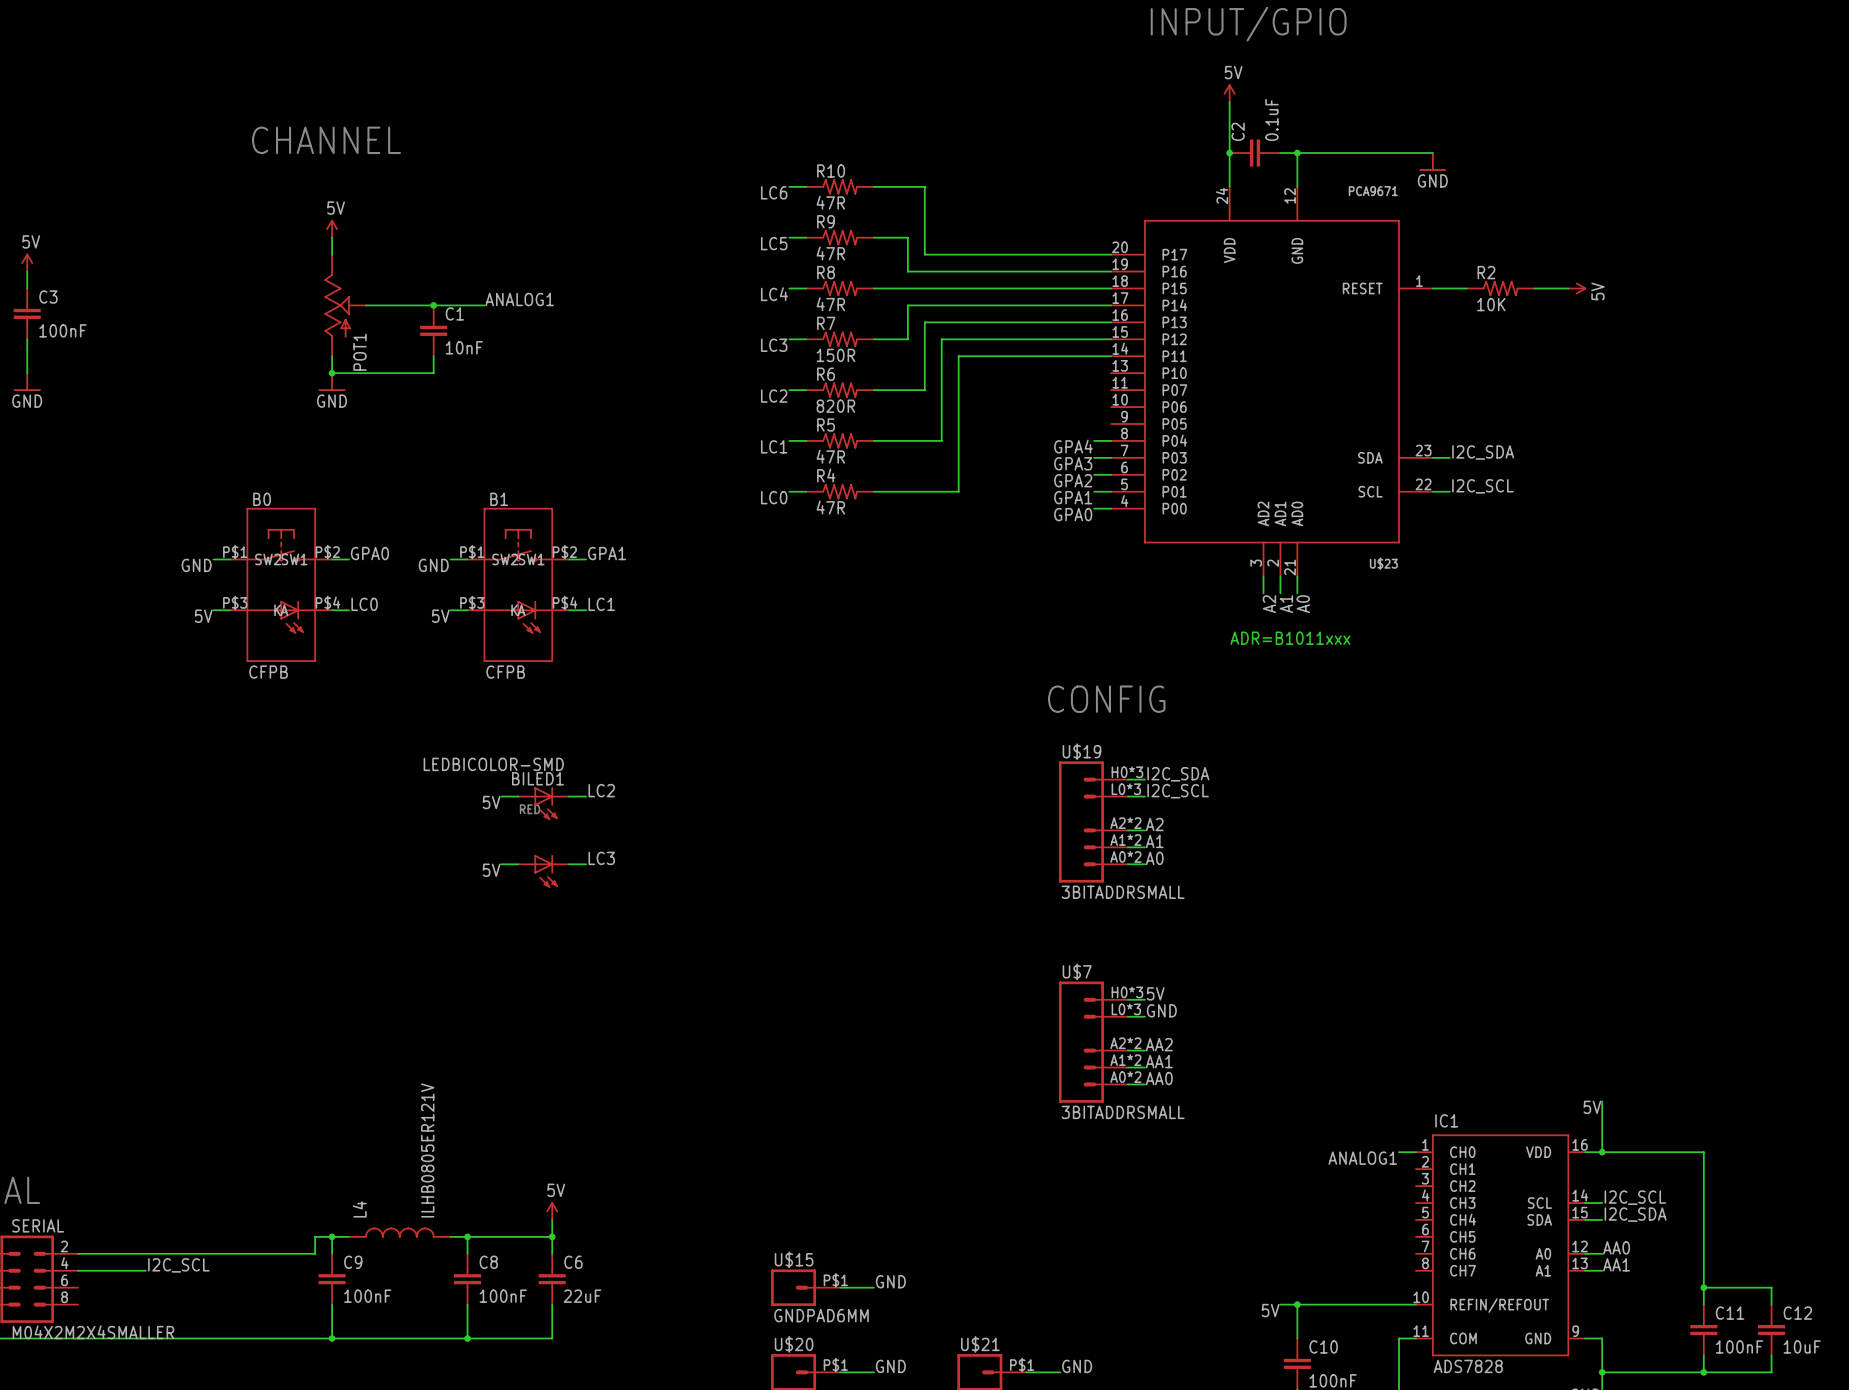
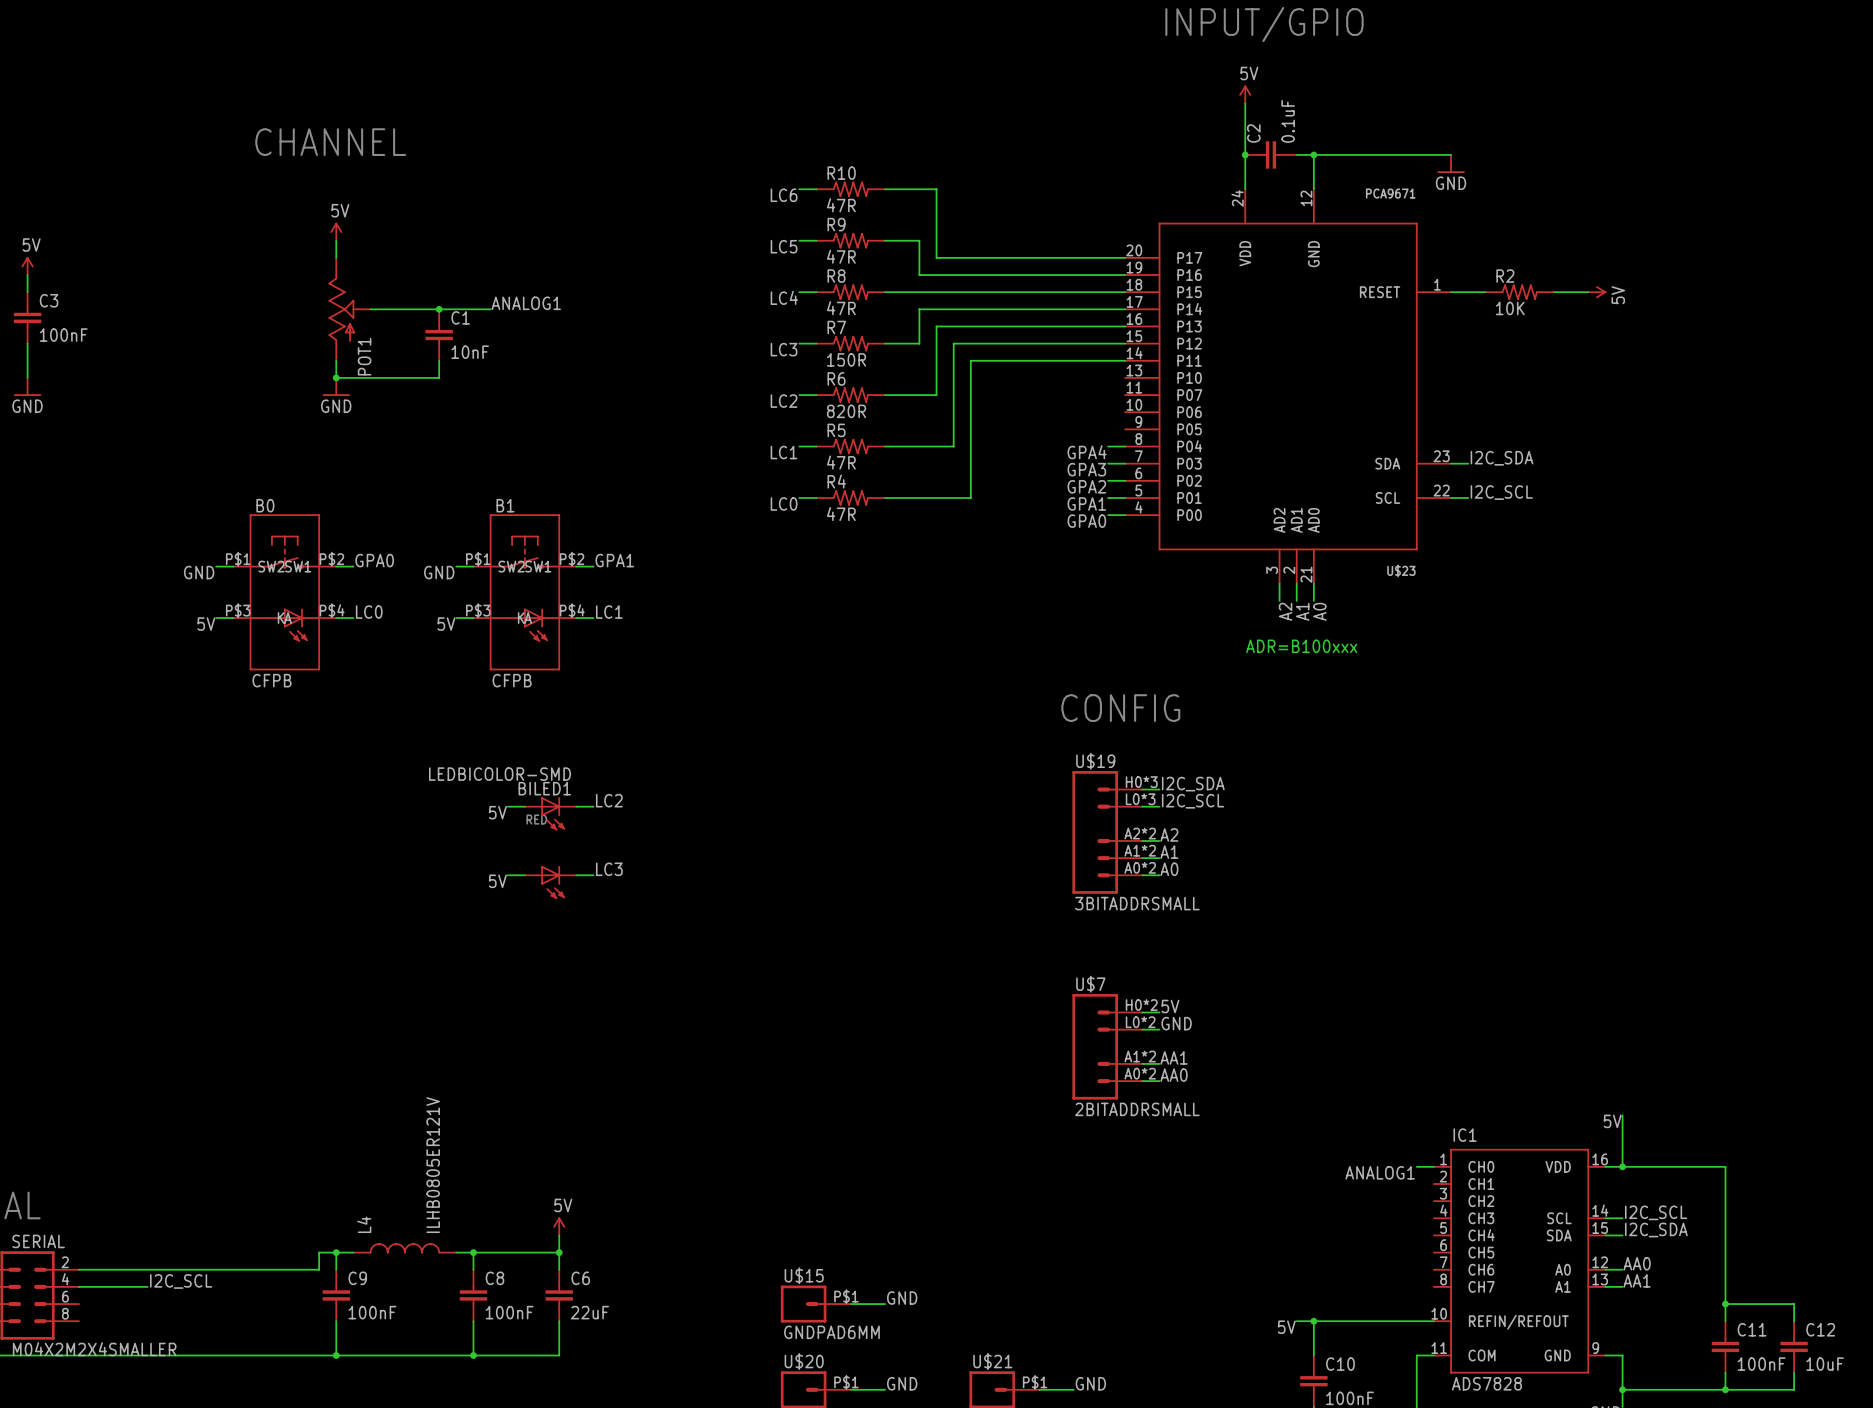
text: ADR=B1011xxx (1290, 638) -> ADR=B100xxx (1301, 646)
U$7 symbol: [1058, 981, 1129, 1103] -> [1072, 993, 1143, 1100]
label: AA2 (1159, 1044) -> AA1 (1174, 1057)
label: AA1 (1159, 1061) -> AA0 (1174, 1075)
label: AA0 (1159, 1078) -> none
wire: (1128, 1084) (1144, 1084) -> none
U$7 value: 3BITADDRSMALL (1123, 1112) -> 2BITADDRSMALL (1137, 1109)

